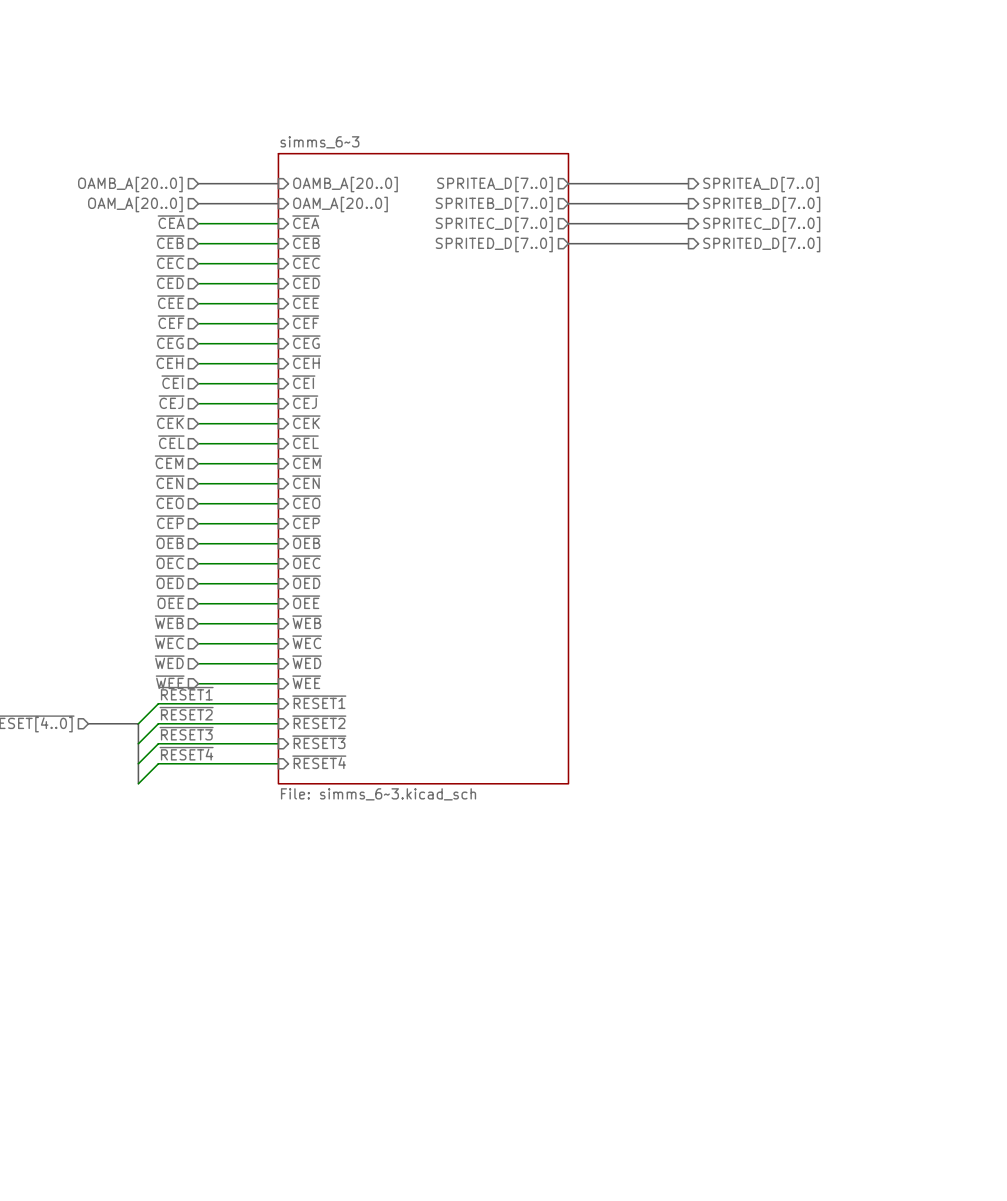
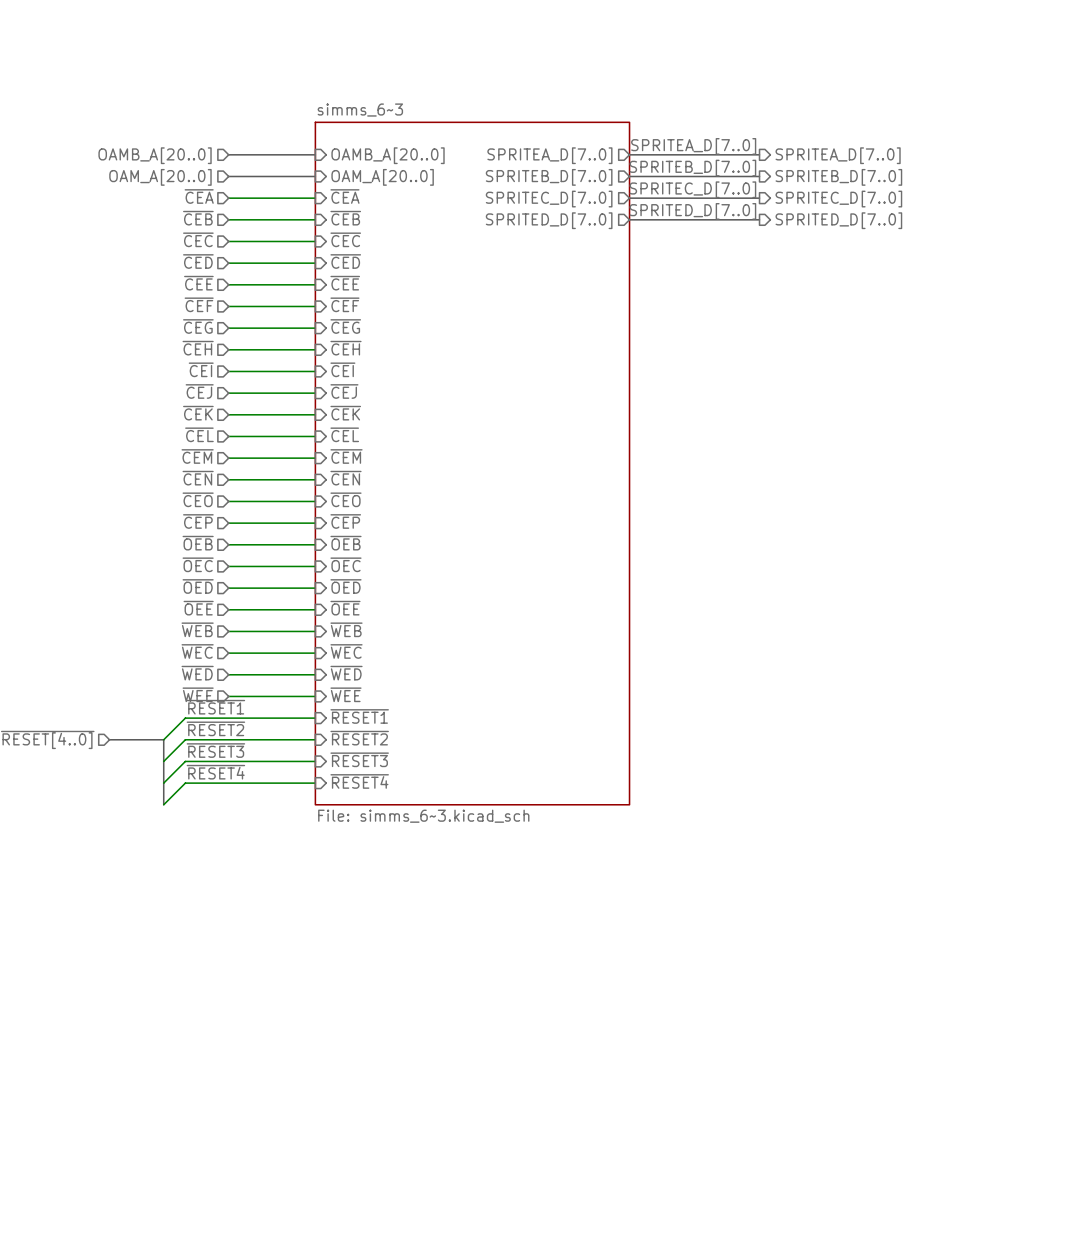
label: none -> SPRITEA_D[7..0] (693, 146)
label: none -> SPRITEB_D[7..0] (692, 168)
label: none -> SPRITEC_D[7..0] (692, 189)
label: none -> SPRITED_D[7..0] (692, 211)

